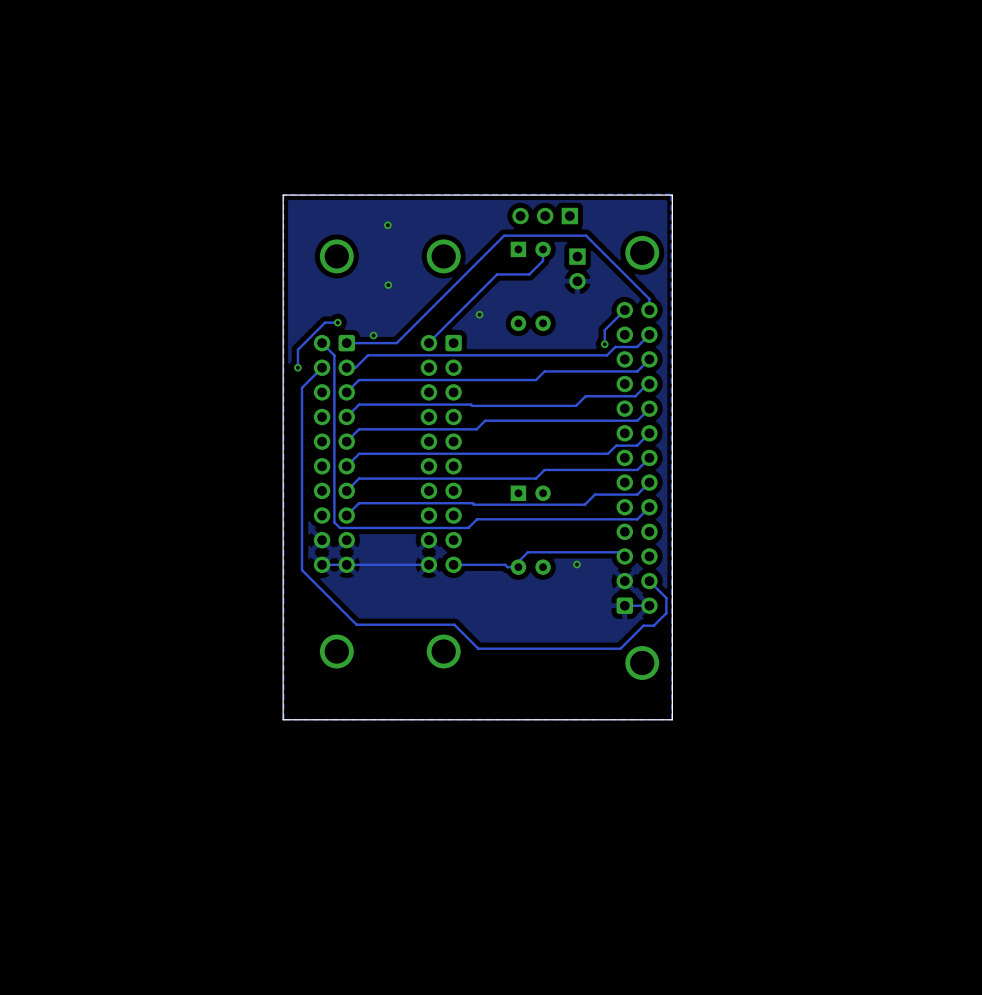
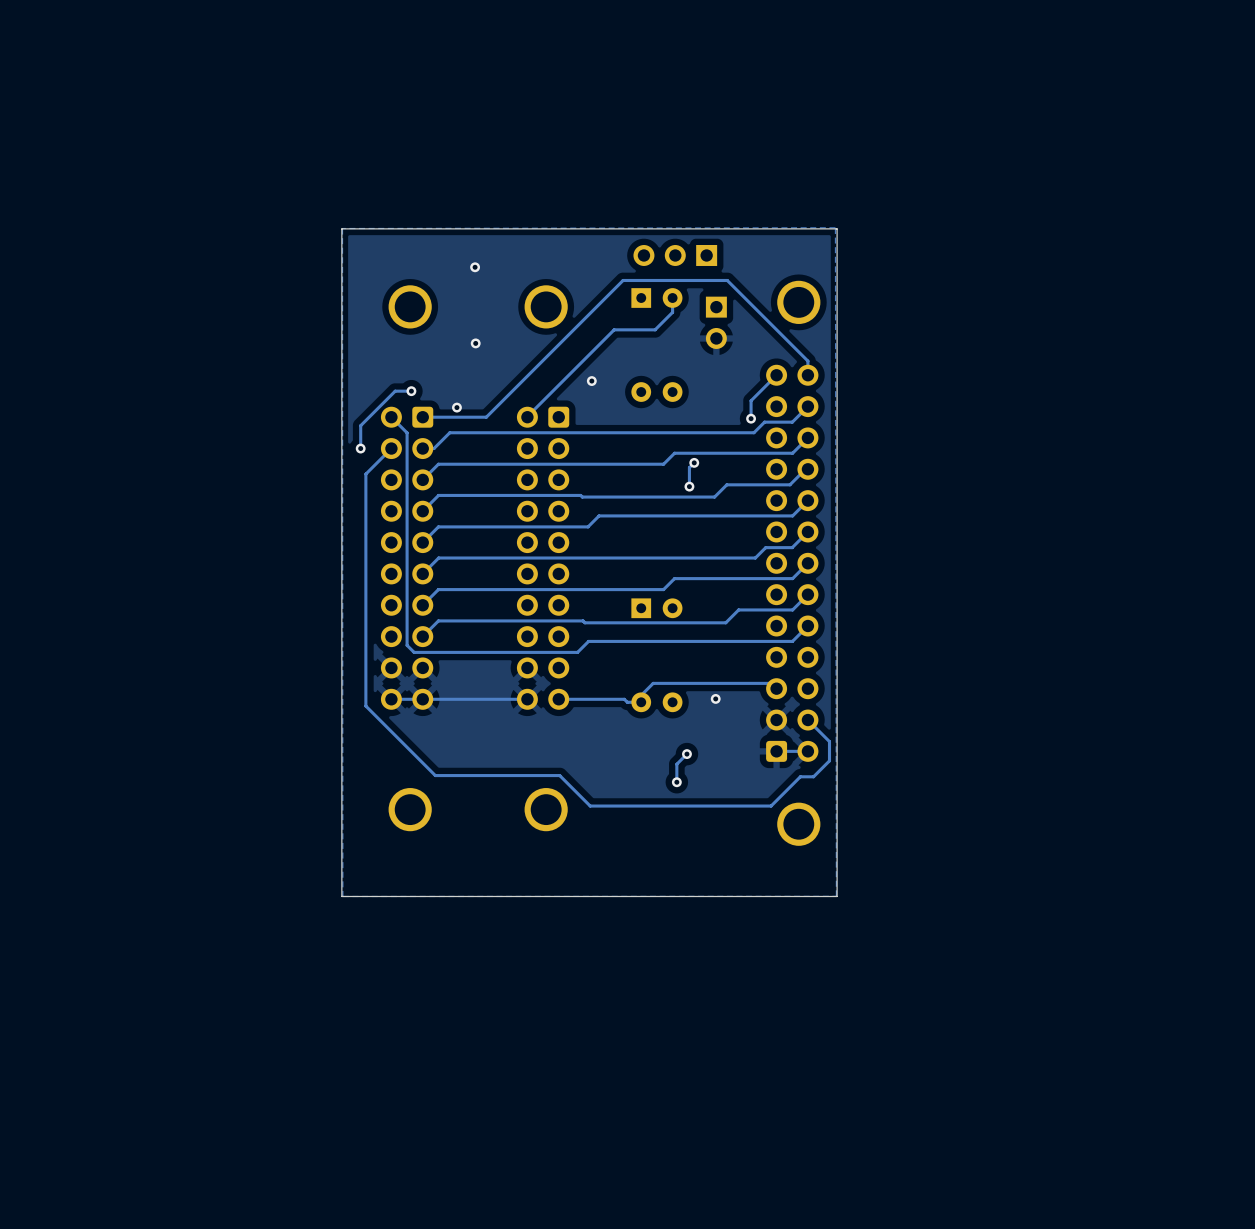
track: none -> (694, 462) (689, 467) (689, 486)
via: none -> (694, 462)
via: none -> (689, 486)
track: none -> (686, 754) (676, 764) (676, 782)
via: none -> (686, 754)
via: none -> (676, 782)

